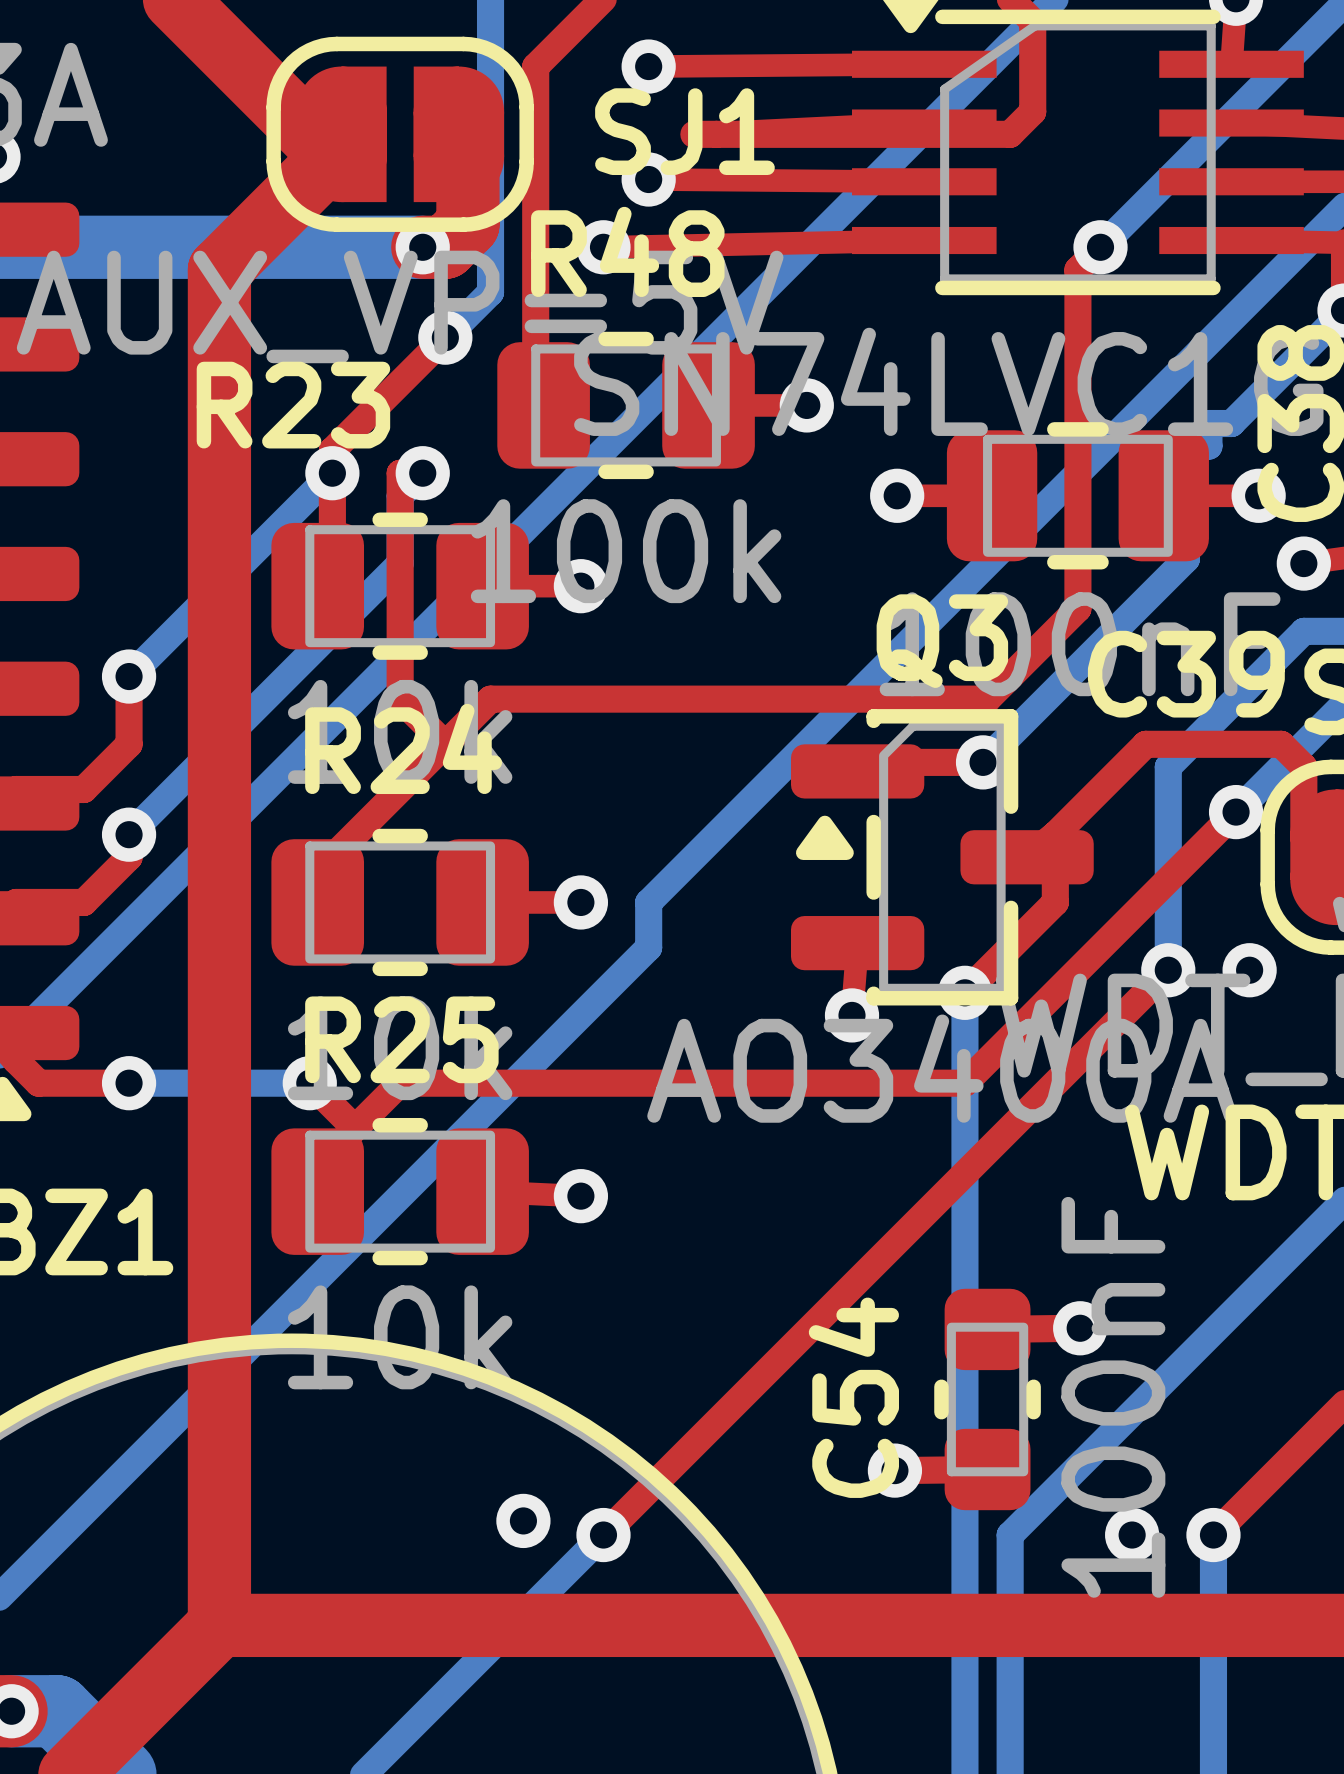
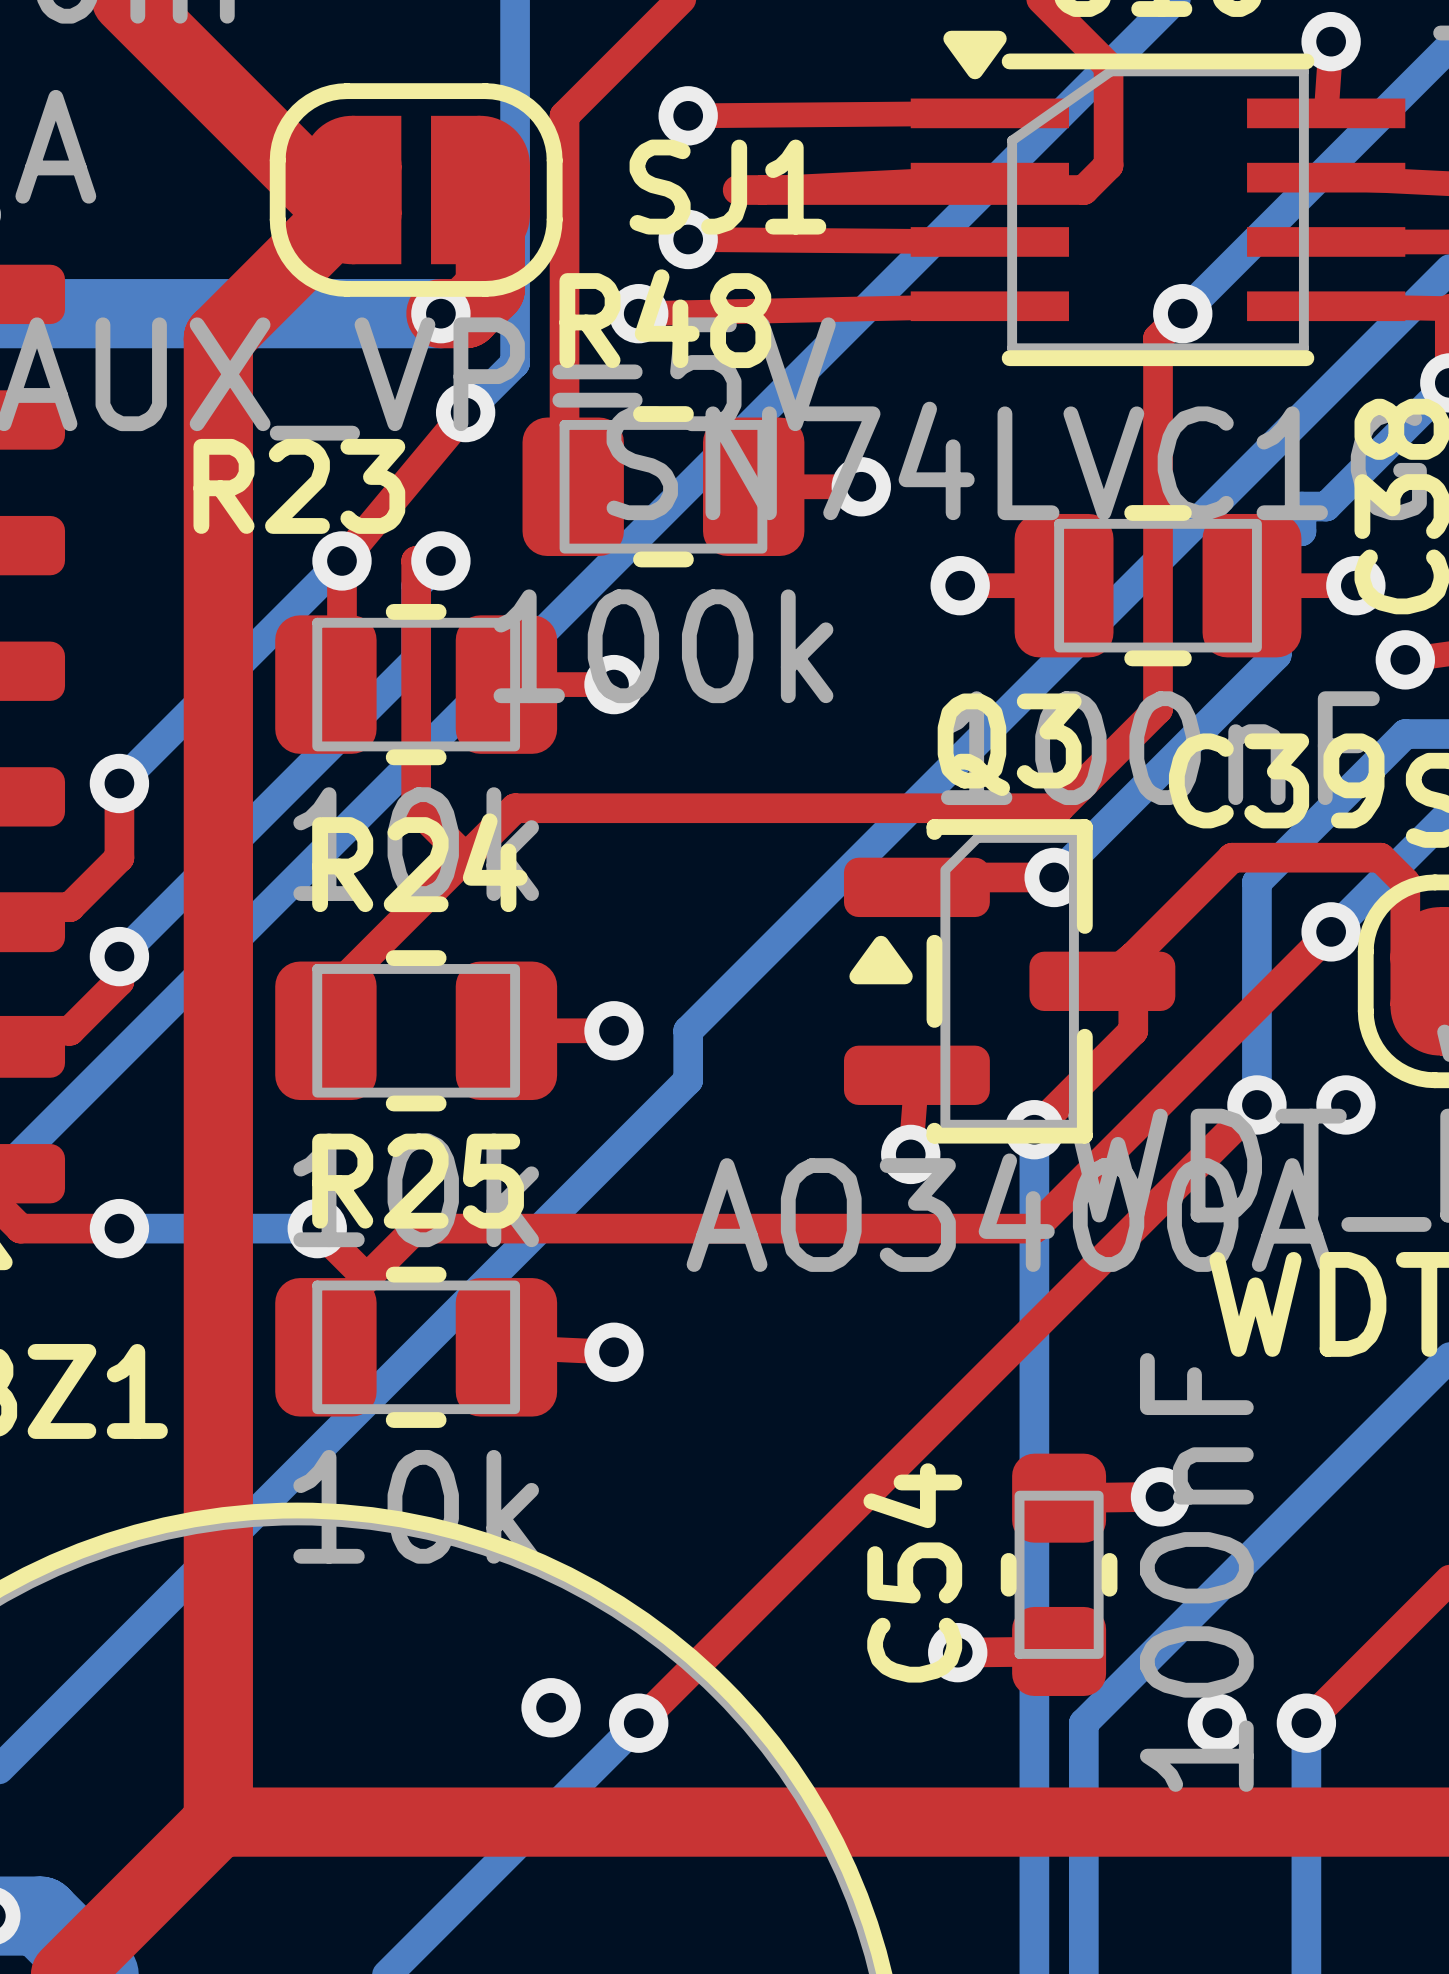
top track: (445, 337) (332, 450) (332, 473) -> (465, 412) (341, 560)

